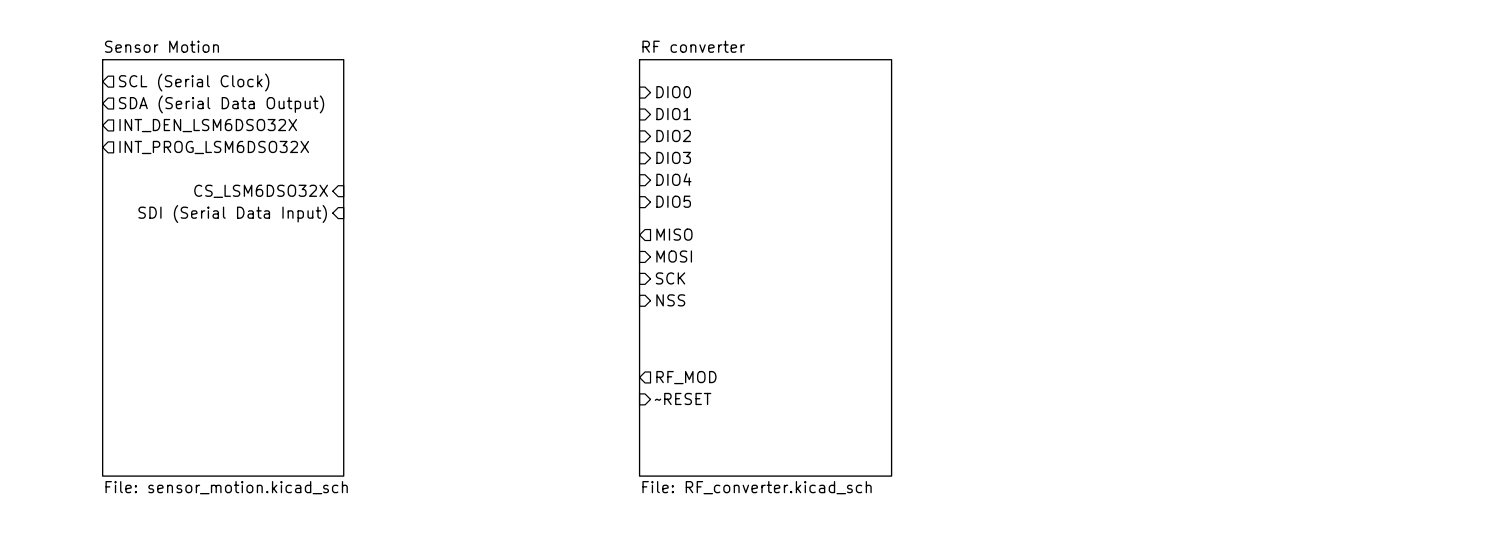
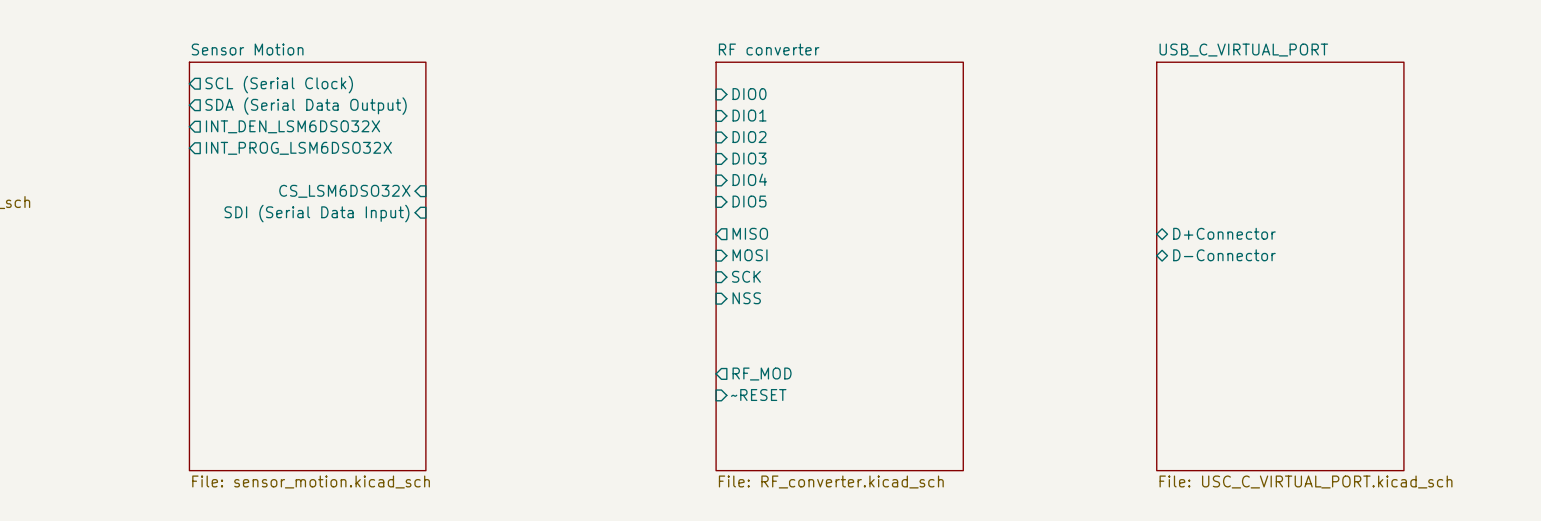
sheet pin: none -> D+Connector (1224, 233)
sheet pin: none -> D-Connector (1224, 255)
sheet USB_C_VIRTUAL_PORT: none -> File: USC_C_VIRTUAL_PORT.kicad_sch (1280, 266)

